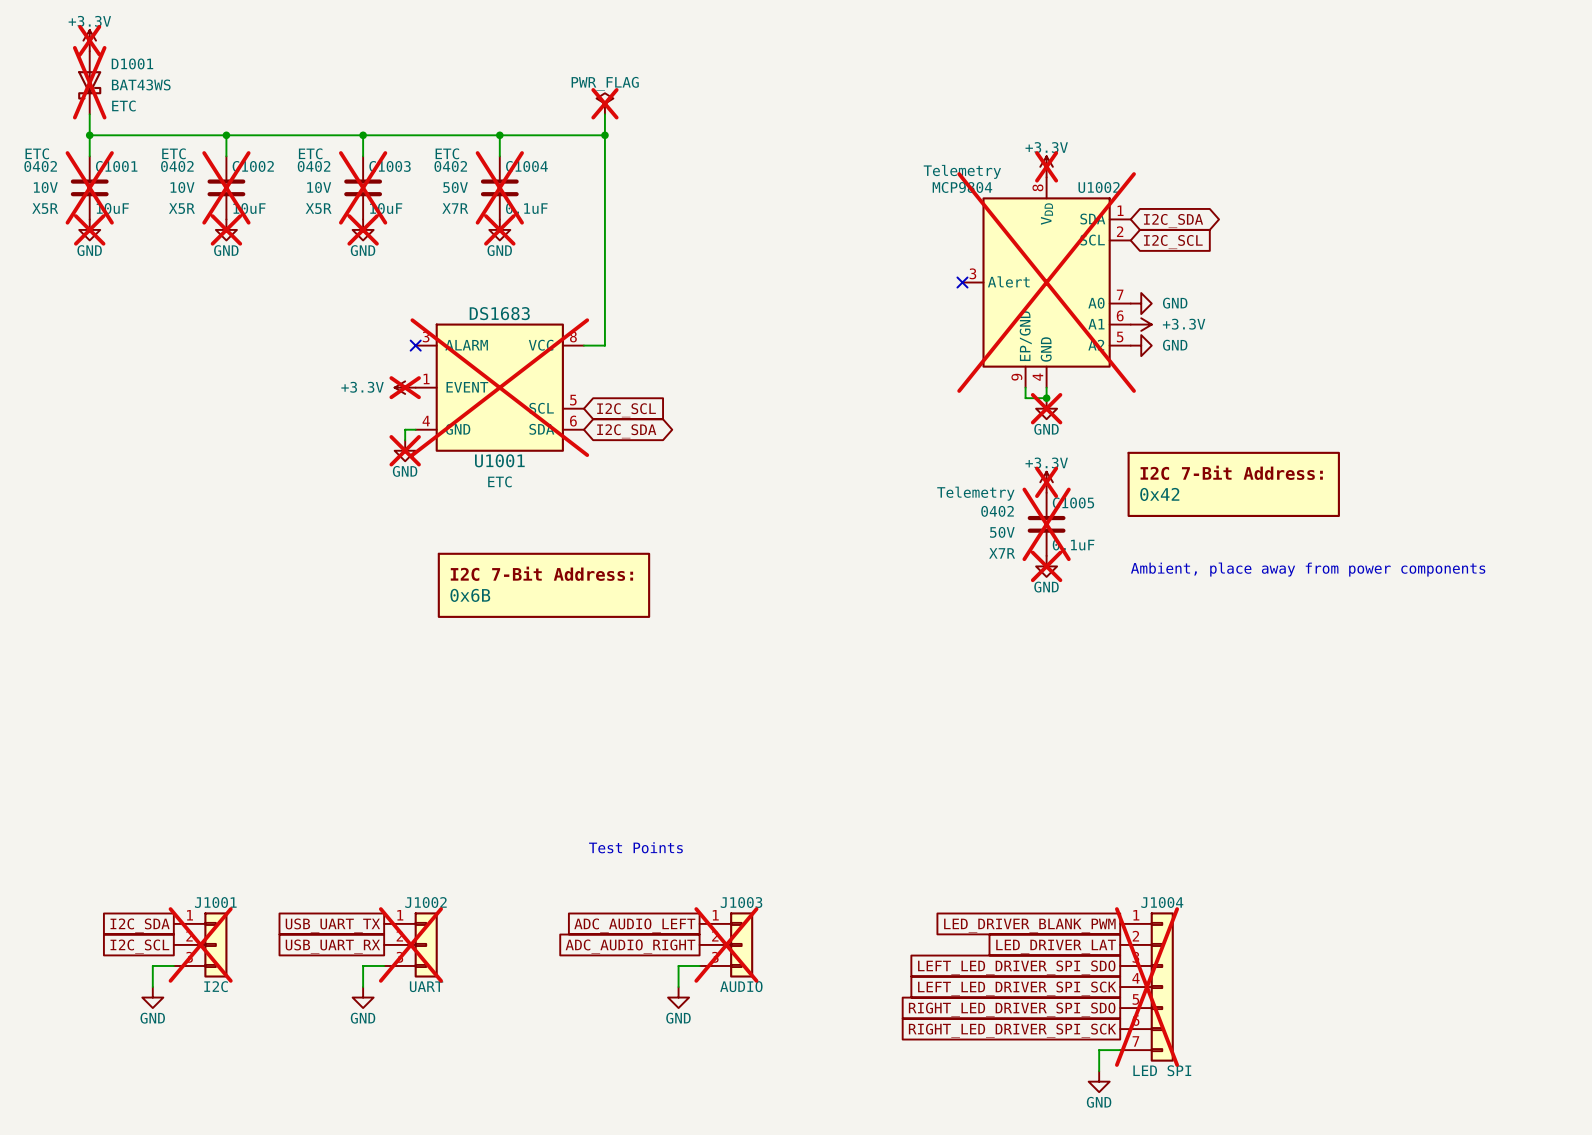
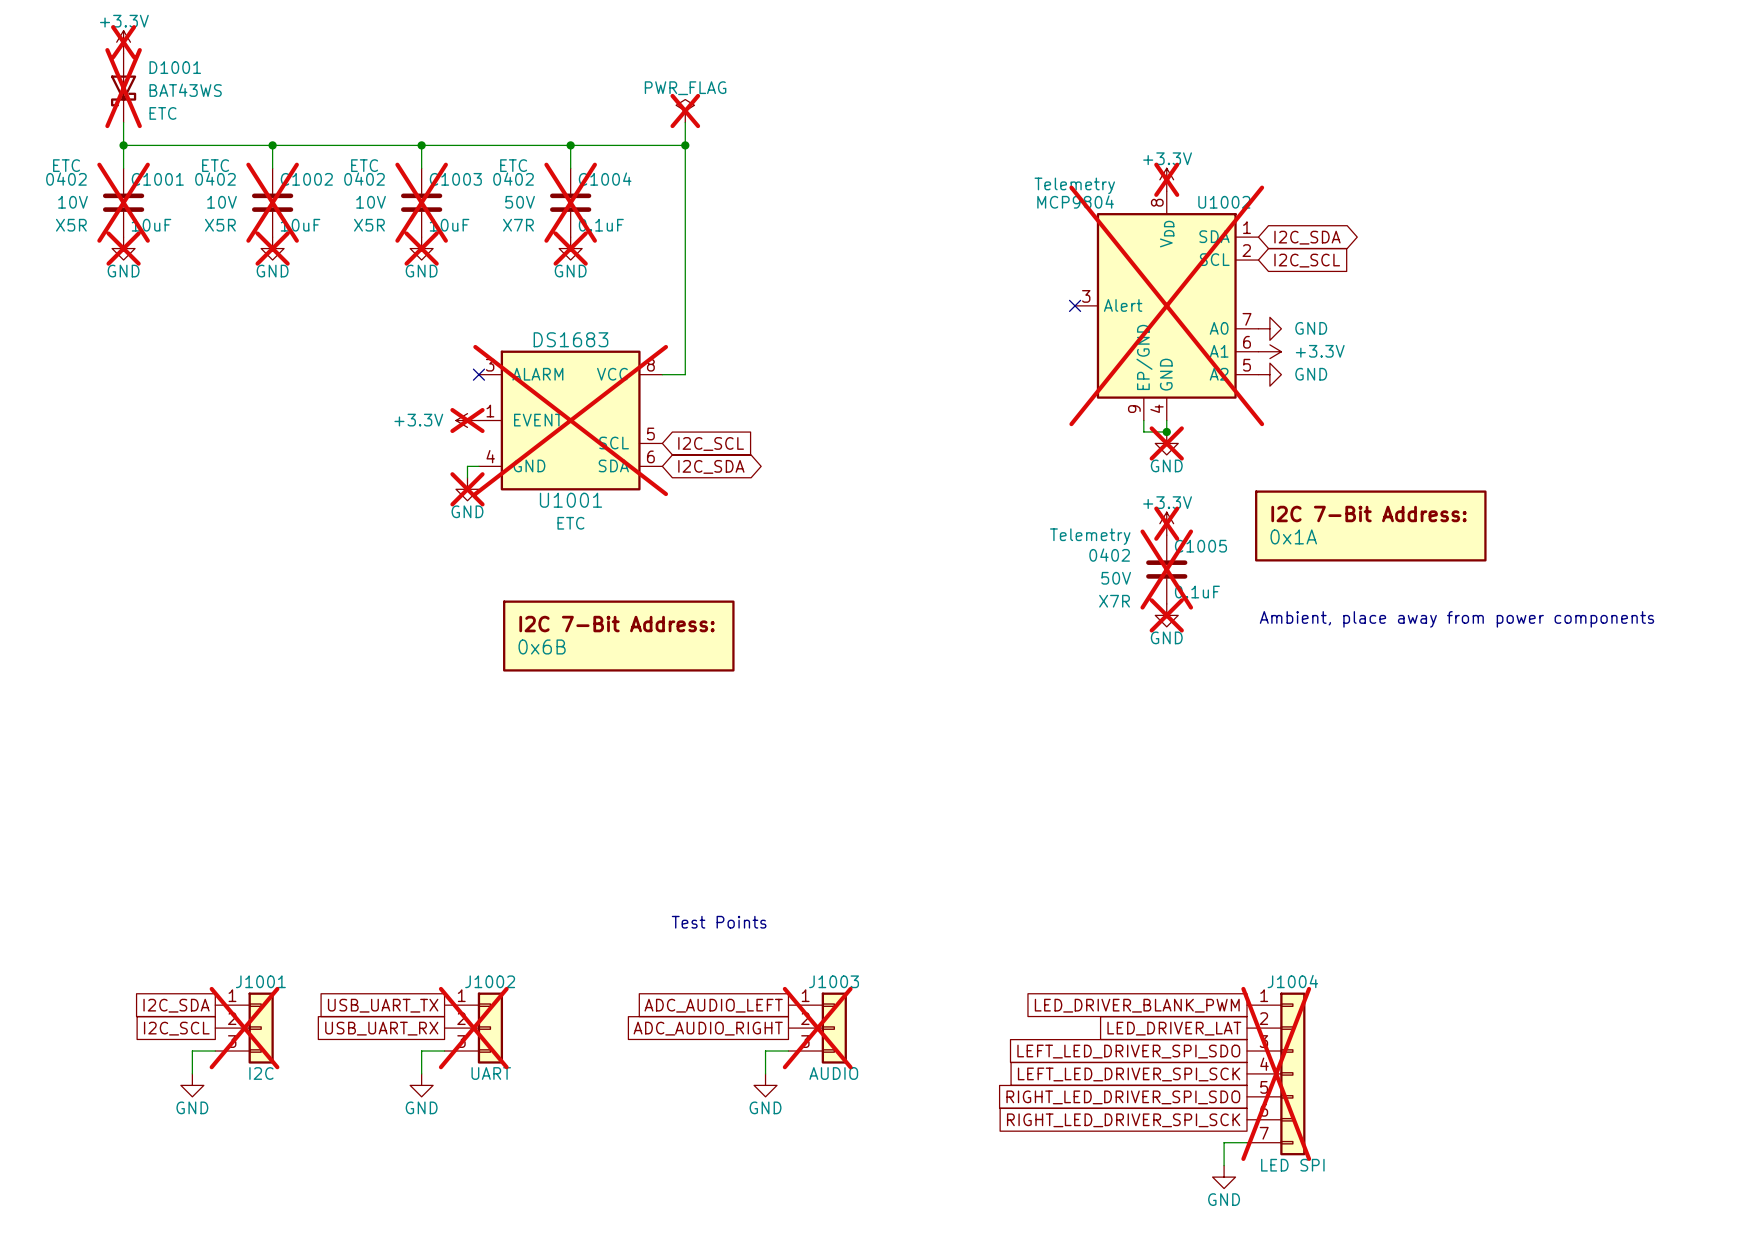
part value: 0x42 (1159, 494) -> 0x1A (1293, 536)

